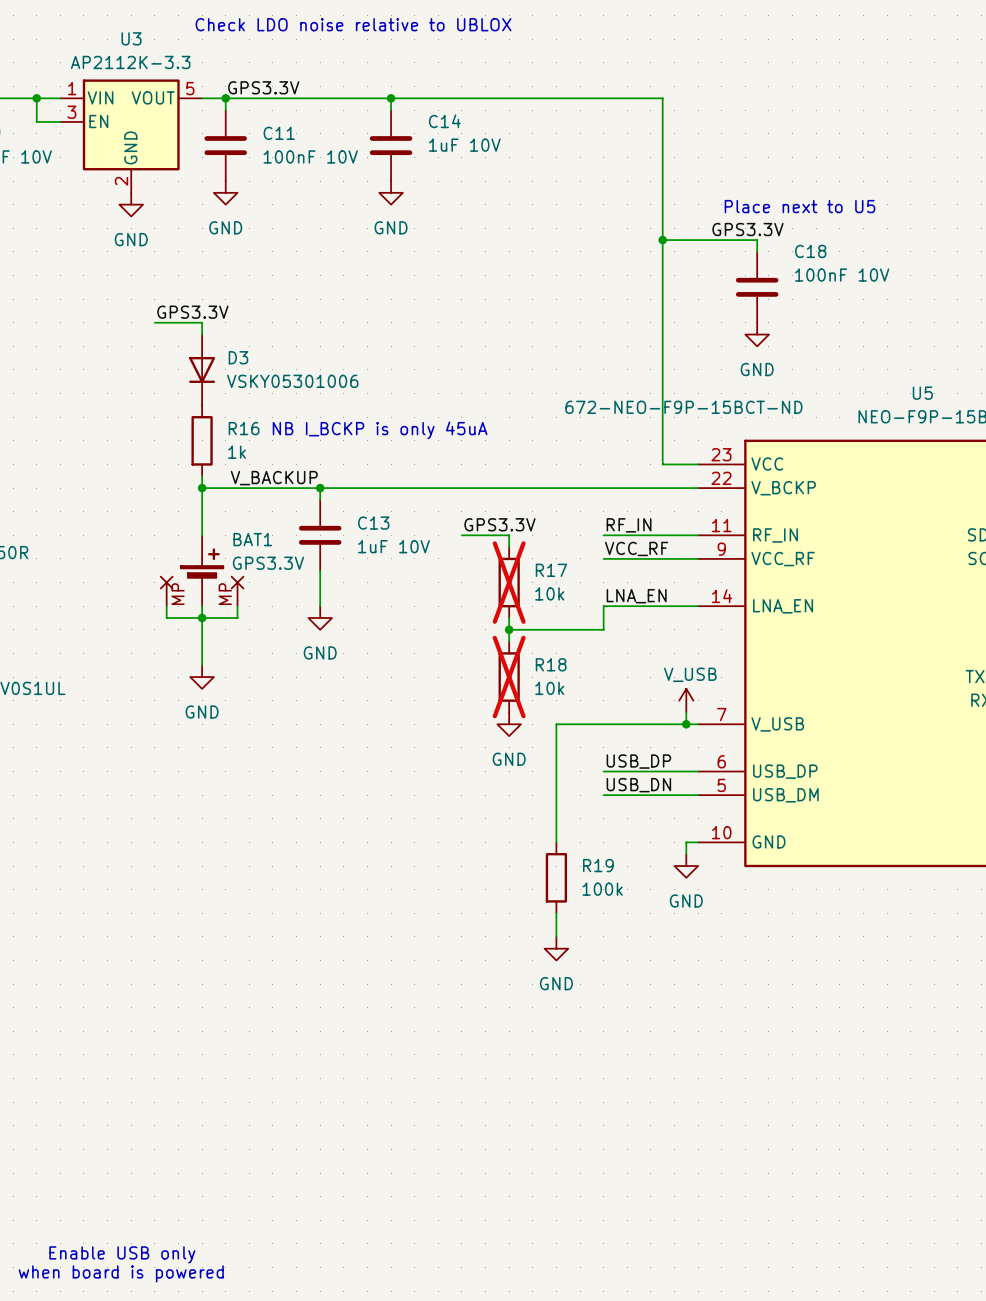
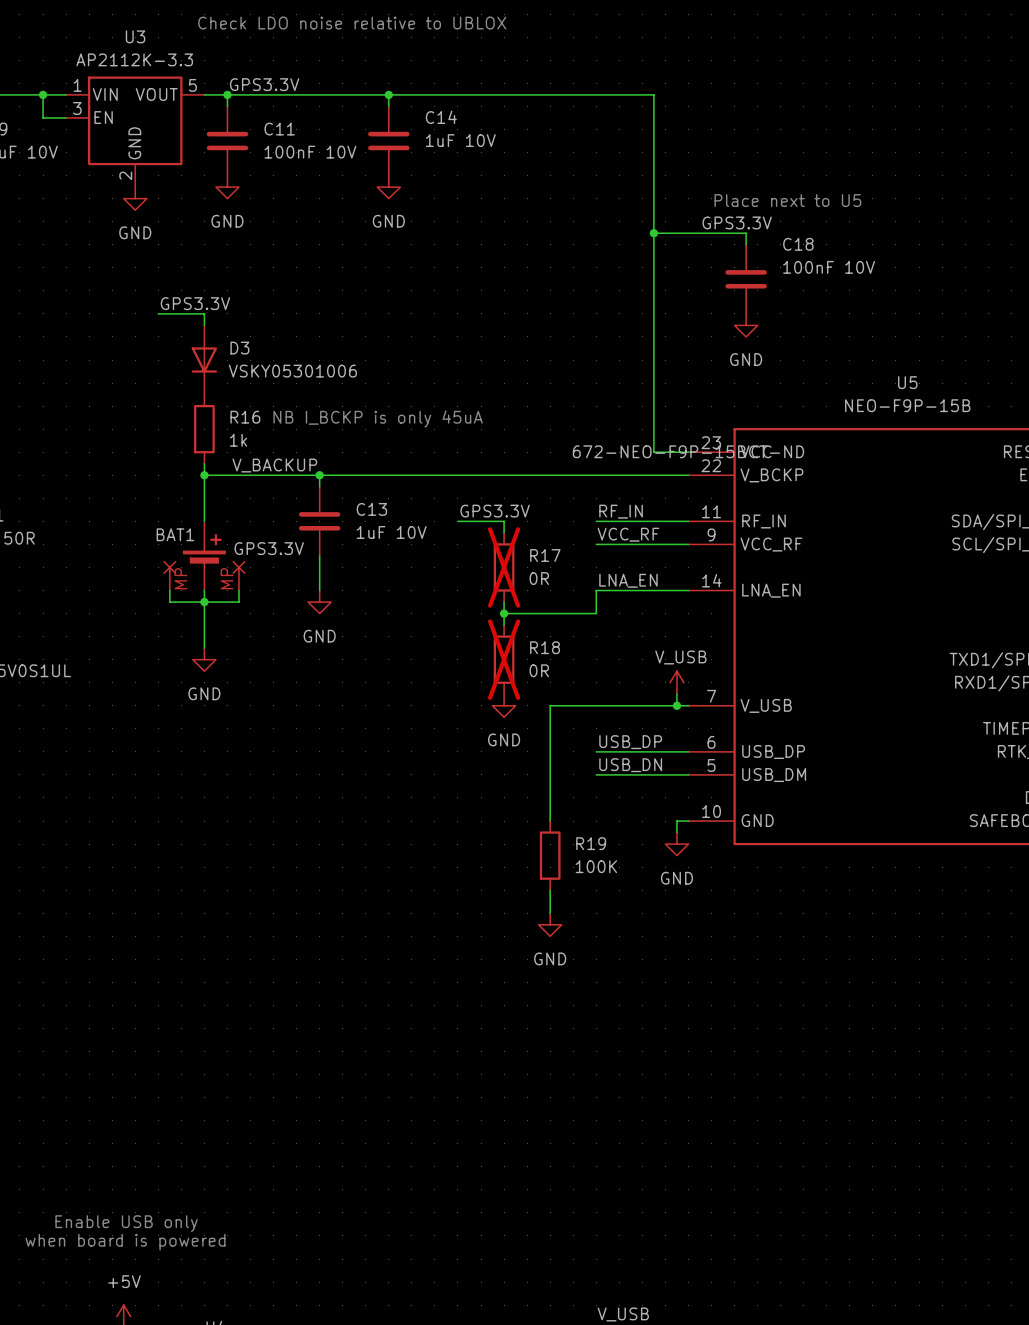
U5 text position: 672-NEO-F9P-15BCT-ND (683, 407) -> 672-NEO-F9P-15BCT-ND (688, 451)
BAT1 name position: BAT1 (252, 539) -> BAT1 (175, 534)
R17 value: 10k (549, 593) -> 0R (539, 578)
R18 value: 10k (549, 688) -> 0R (539, 670)
R19 value: 100k (602, 889) -> 100K (596, 866)

